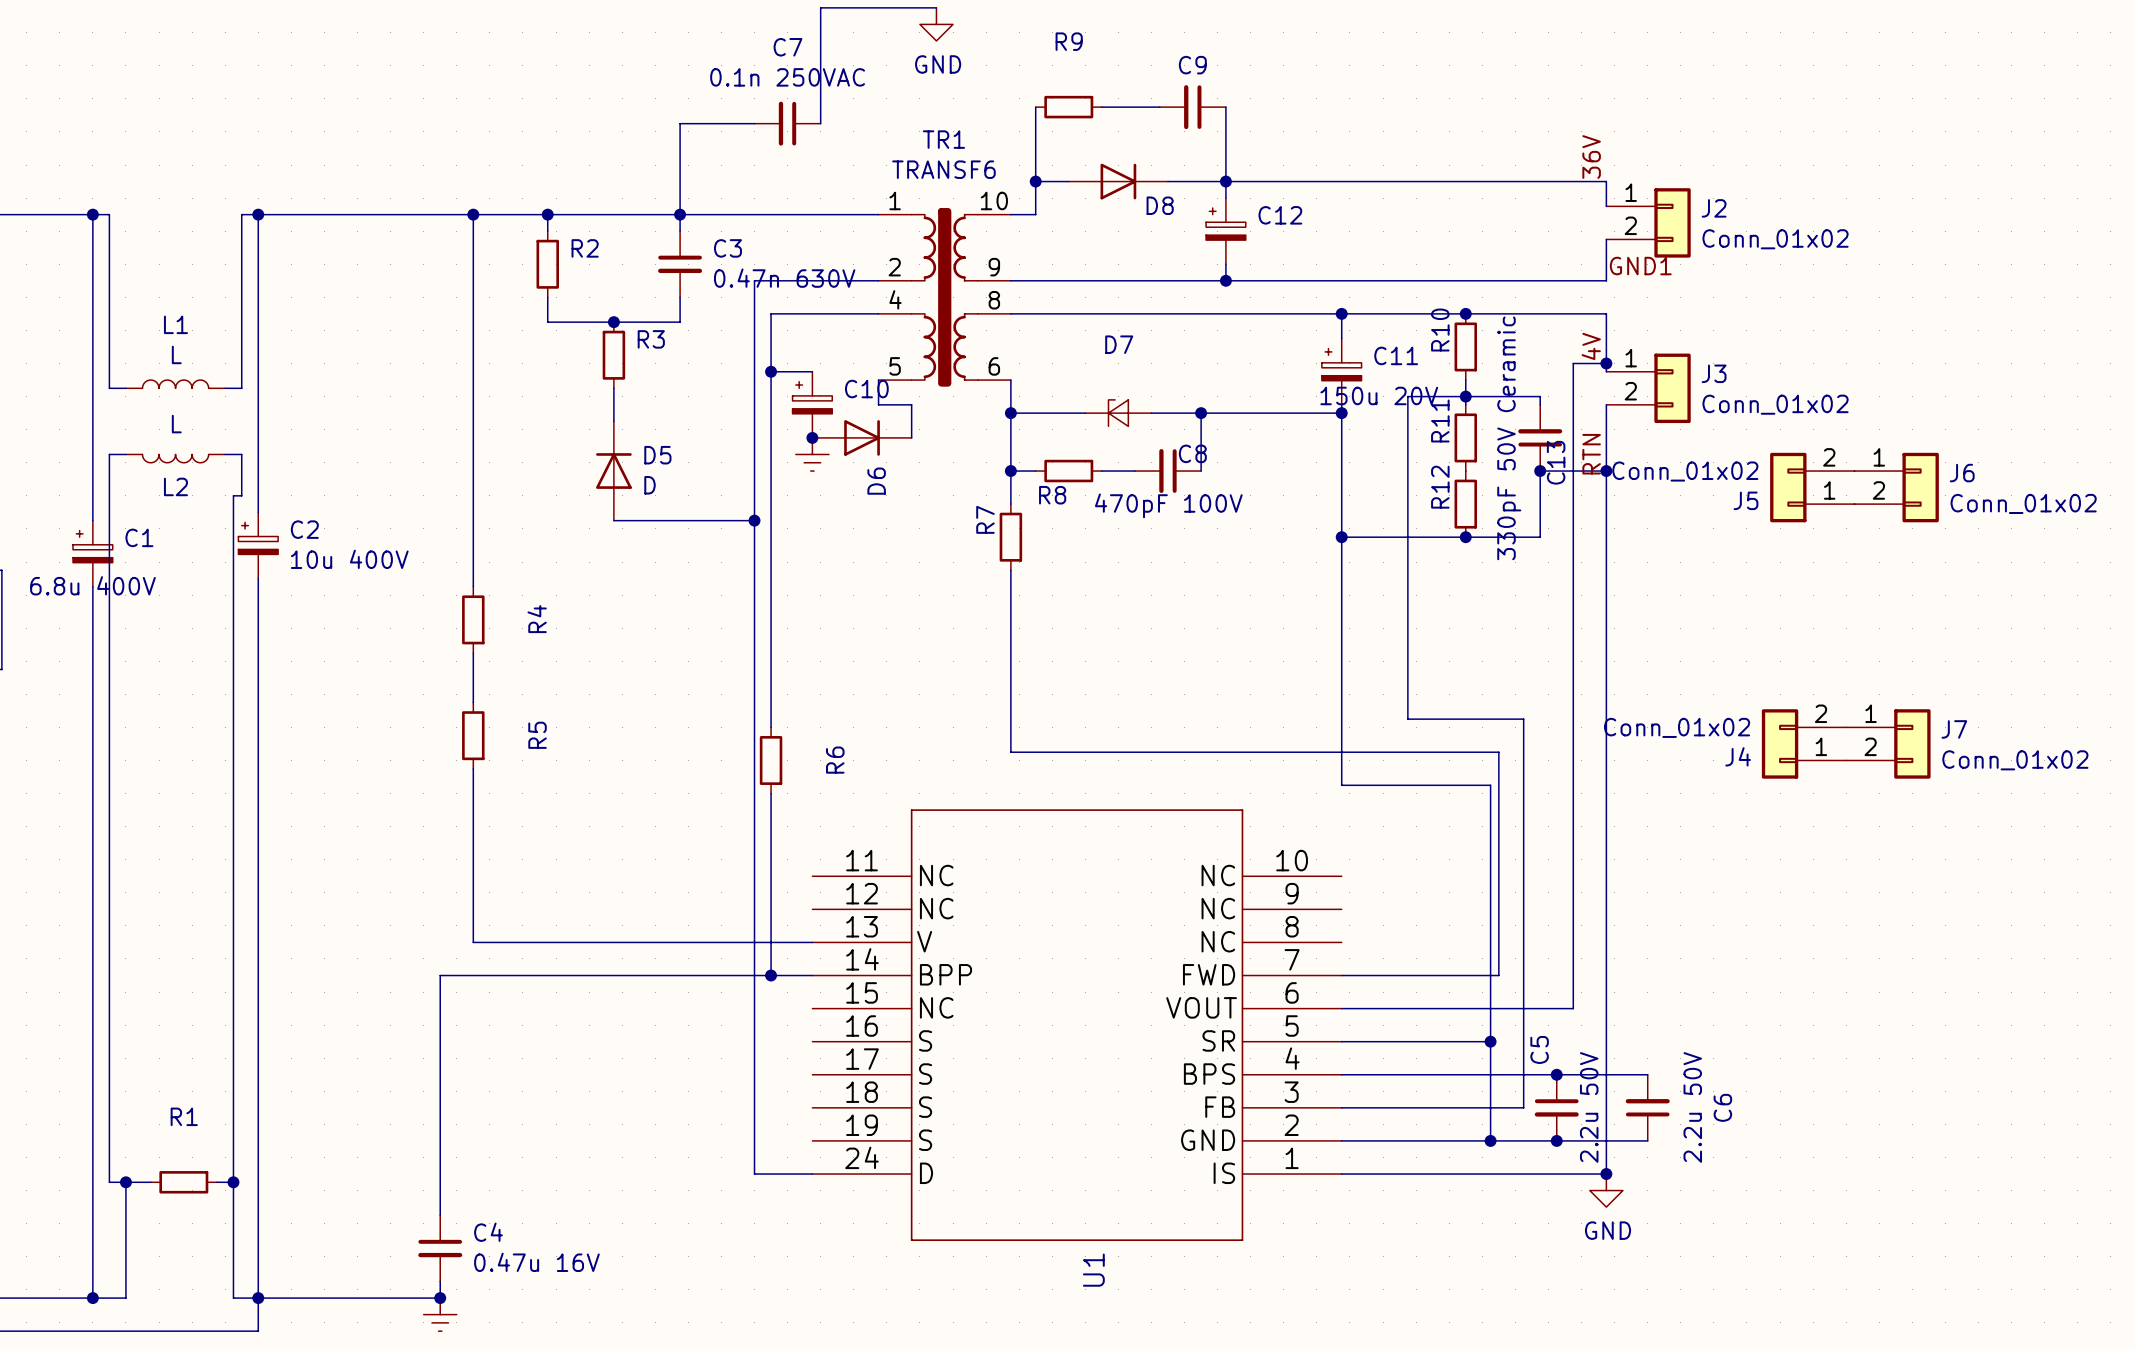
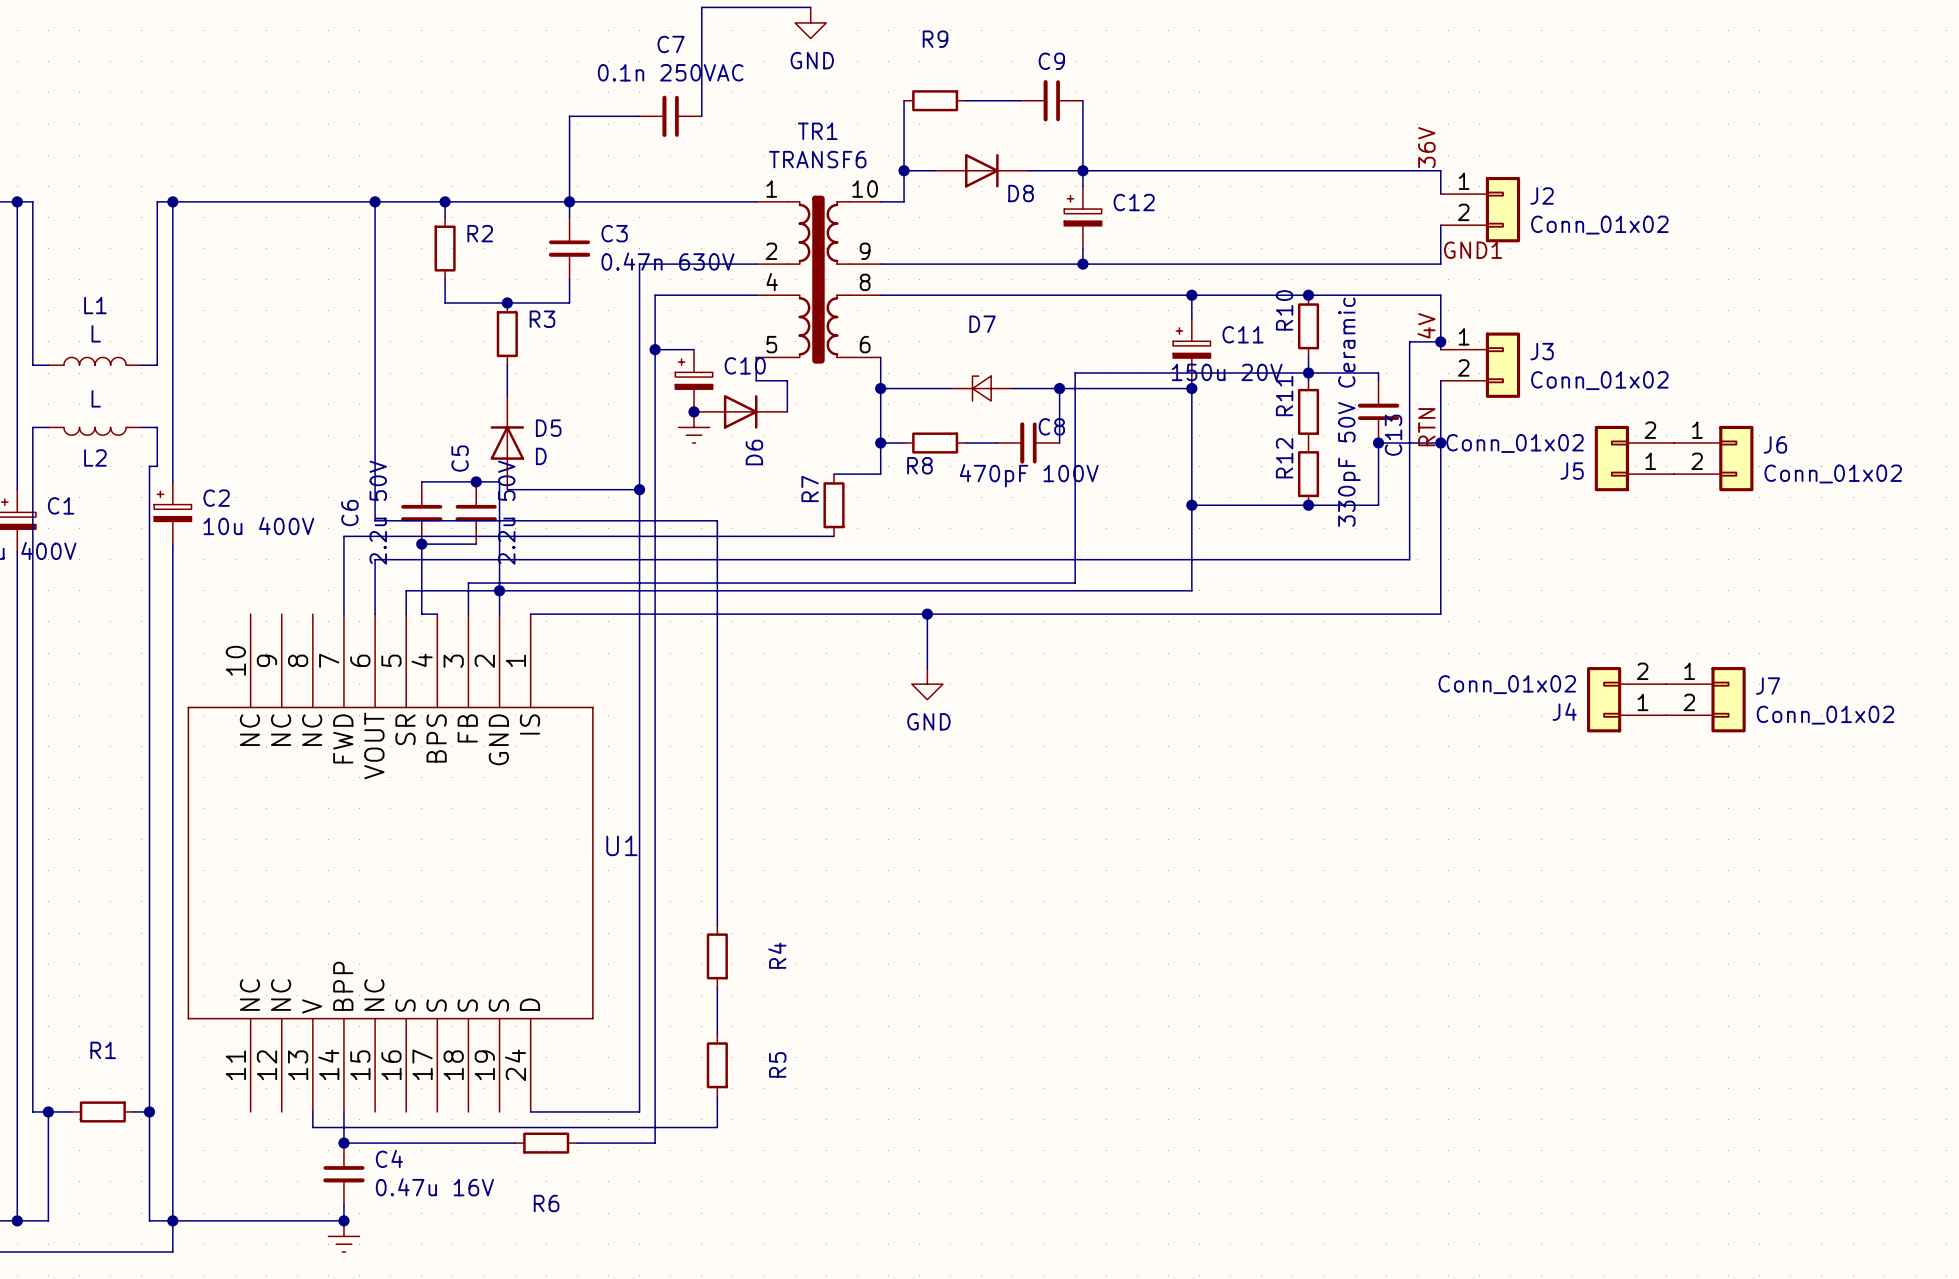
wire: (1407, 396) (1407, 719) (1523, 719) (1523, 1107) (1341, 1107) -> (1254, 373) (1075, 373) (1075, 583) (468, 583) (468, 614)
wire: none -> (834, 474) (880, 474)
wire: none -> (421, 481) (499, 481) (499, 614)
junction: none -> (476, 481)
R7 position: (1010, 537) -> (834, 505)
wire: (473, 553) (473, 586) -> (375, 520) (717, 520) (717, 925)
wire: none -> (834, 536) (343, 536) (343, 614)
wire: (1010, 570) (1010, 752) (1498, 752) (1498, 975) (1341, 975) -> none
junction: none -> (421, 544)
wire: none -> (476, 544) (421, 544) (421, 614) (437, 614)
wire: (1573, 595) (1573, 1008) (1341, 1008) -> (1409, 559) (375, 559) (375, 614)
R4 position: (473, 619) -> (717, 956)
junction: none -> (499, 590)
wire: (1341, 628) (1341, 785) (1490, 785) (1490, 1140) -> (1191, 590) (406, 590) (406, 614)
wire: none -> (927, 614) (927, 668)
junction: none -> (927, 614)
wire: (1606, 652) (1606, 1174) (1341, 1174) -> (1440, 614) (530, 614)
wire: none -> (655, 684) (655, 746)
power symbol: none -> GND (927, 684)
R5 position: (473, 735) -> (717, 1065)
R6 rotation: 0° (771, 760) -> 90° clockwise (546, 1143)
R6 position: (771, 760) -> (546, 1143)
wire: (473, 768) (473, 942) (812, 942) -> none
wire: none -> (655, 917) (655, 1143) (577, 1143)
junction: (771, 975) -> none
wire: (812, 975) (440, 975) (440, 1182) -> none
U1 rotation: 0° (1077, 1025) -> 90° counterclockwise (390, 863)
U1 position: (1077, 1025) -> (390, 863)
wire: (1341, 1041) (1490, 1041) -> none
junction: (1490, 1041) -> none
wire: none -> (717, 987) (717, 1034)
wire: (1341, 1074) (1647, 1074) -> none
junction: (1556, 1074) -> none
C5 position: (1556, 1107) -> (476, 513)
C6 rotation: 0° (1647, 1107) -> 180° (421, 513)
C6 position: (1647, 1107) -> (421, 513)
wire: (1341, 1140) (1647, 1140) -> none
junction: (1490, 1140) -> none
junction: (1556, 1140) -> none
wire: none -> (717, 1096) (717, 1127) (312, 1127) (312, 1111)
wire: (754, 1174) (812, 1174) -> (639, 1104) (639, 1111) (530, 1111)
junction: (1606, 1174) -> none
power symbol: GND (1606, 1190) -> none
wire: none -> (343, 1143) (515, 1143)
junction: none -> (343, 1143)

